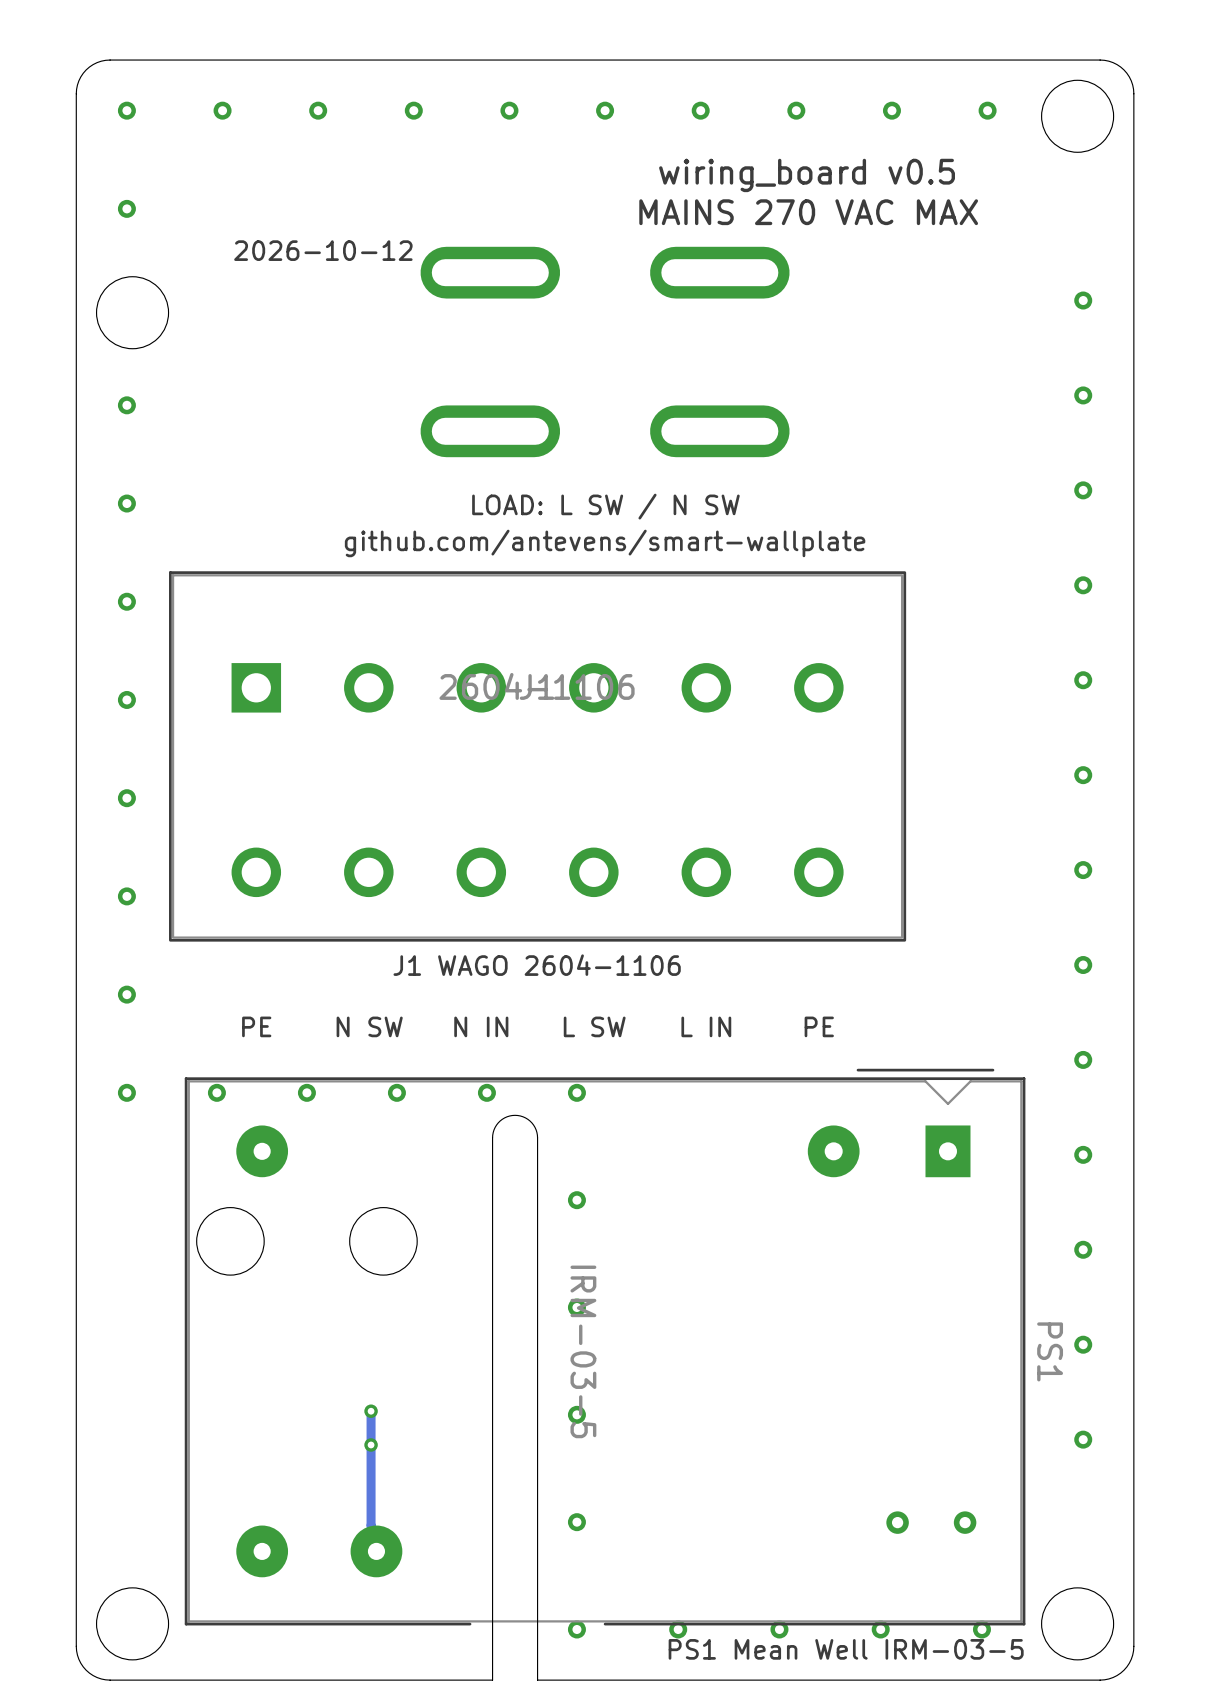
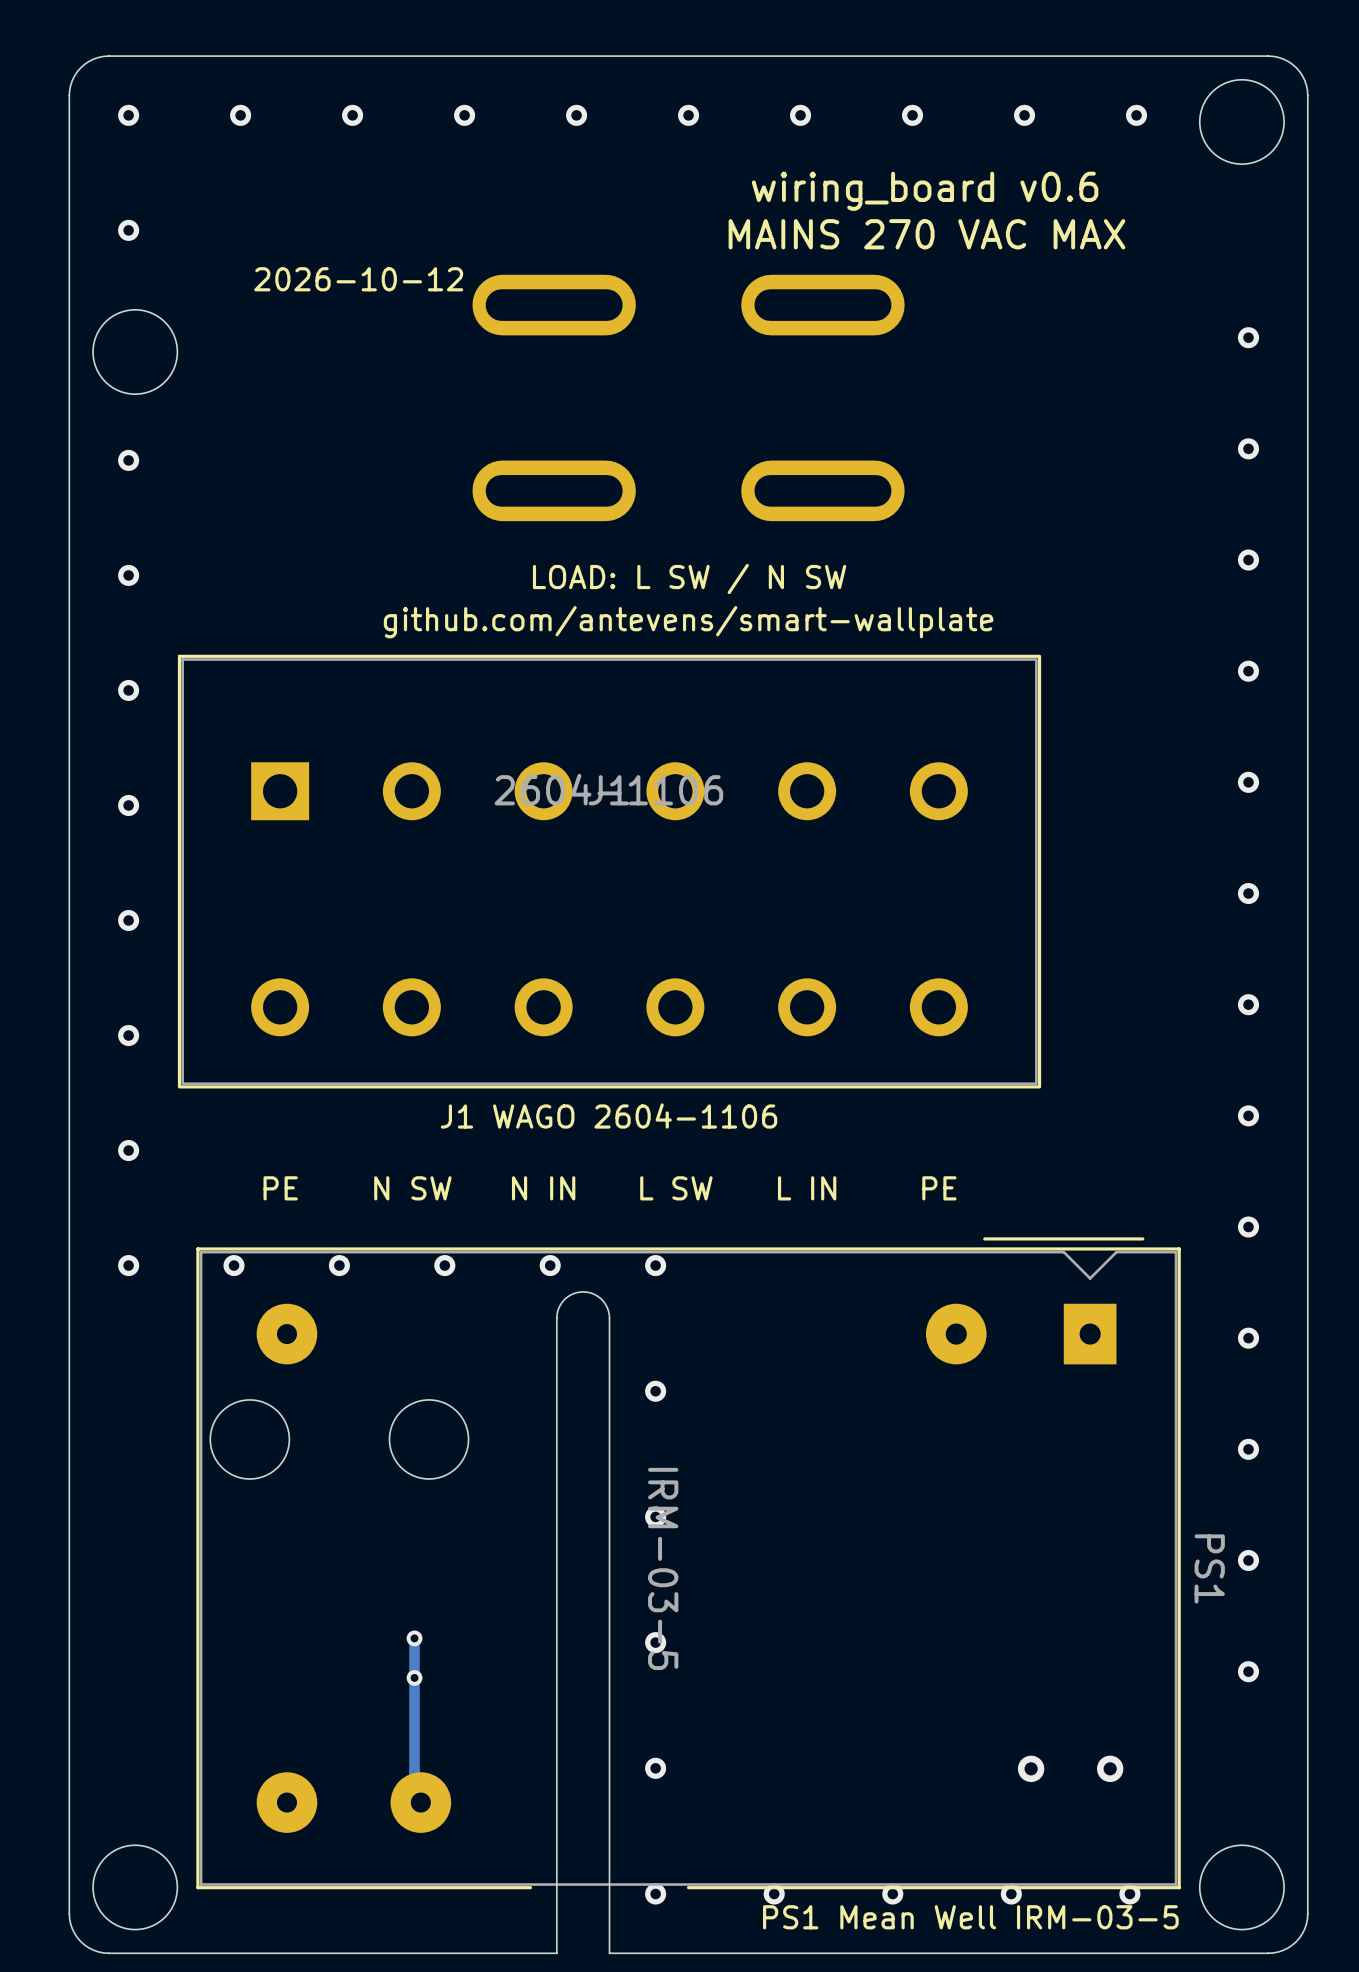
text: wiring_board v0.5 (807, 175) -> wiring_board v0.6 (925, 191)

